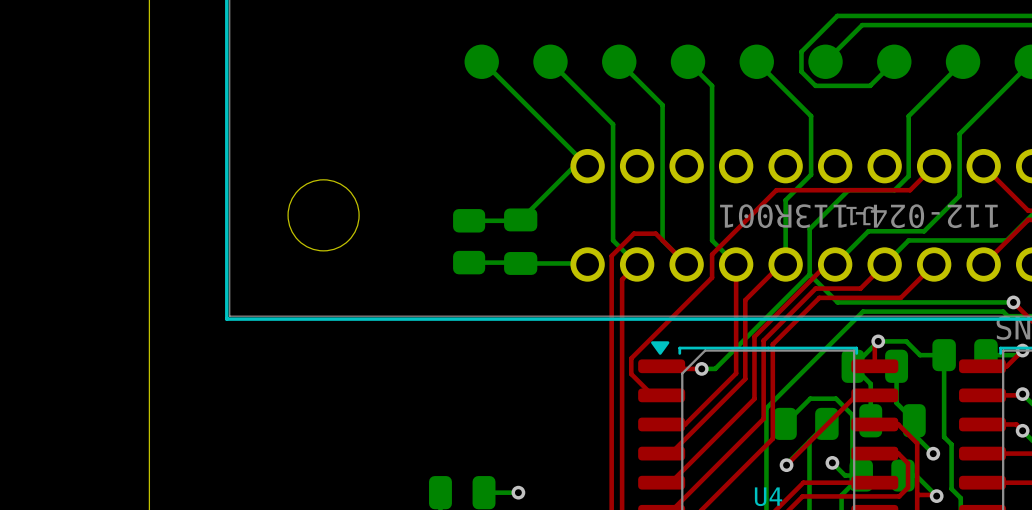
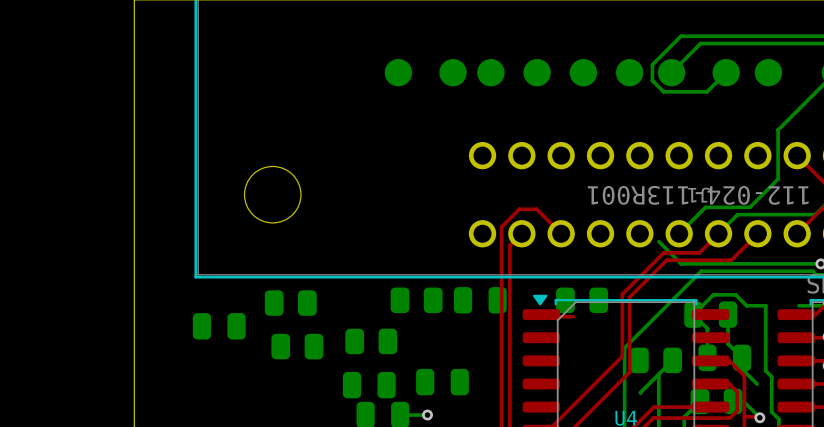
bottom track: (481, 61) (587, 166) (574, 166) (519, 220) (469, 220) -> none
bottom track: (550, 61) (613, 124) (613, 240) (637, 264) -> none
part: none -> (490, 72)
bottom track: (619, 61) (662, 105) (662, 240) (686, 264) -> none
part: (619, 61) -> none
part: none -> (537, 72)
bottom track: (688, 61) (712, 85) (712, 240) (736, 264) -> none
part: (688, 61) -> none
part: none -> (583, 72)
bottom track: (756, 61) (811, 116) (811, 174) (785, 200) (785, 264) -> none
part position: (756, 61) -> (629, 72)
bottom track: (963, 61) (908, 116) (908, 176) (894, 190) (848, 190) (809, 229) (809, 274) (715, 368) (701, 368) -> none
part position: (963, 61) -> (768, 72)
top track: (934, 166) (910, 190) (776, 190) (712, 254) (712, 277) (631, 358) (631, 374) (652, 395) (661, 395) -> none
part: (469, 241) -> none
part: (520, 241) -> none
bottom track: (469, 262) (587, 264) -> none
top track: (736, 264) (736, 373) (685, 424) (661, 424) -> none
top track: (785, 264) (780, 264) (745, 300) (745, 379) (670, 453) (661, 453) -> none
top track: (835, 264) (826, 264) (754, 336) (754, 398) (670, 482) (661, 482) -> none
top track: (875, 341) (874, 366) -> none
via: (878, 341) -> none
part: none -> (416, 300)
part: none -> (480, 300)
part: none -> (582, 300)
part: none -> (290, 303)
part: (965, 355) -> none
via: (701, 368) -> none
part: none -> (219, 326)
top track: (874, 395) (856, 395) (786, 465) -> none
part: none -> (371, 341)
part: none -> (297, 346)
bottom track: (785, 423) (810, 398) (836, 398) (852, 415) (852, 466) (861, 475) (845, 475) (832, 462) -> none
part: none -> (442, 382)
via: (933, 453) -> none
part: none -> (369, 385)
via: (832, 462) -> none
via: (786, 465) -> none

